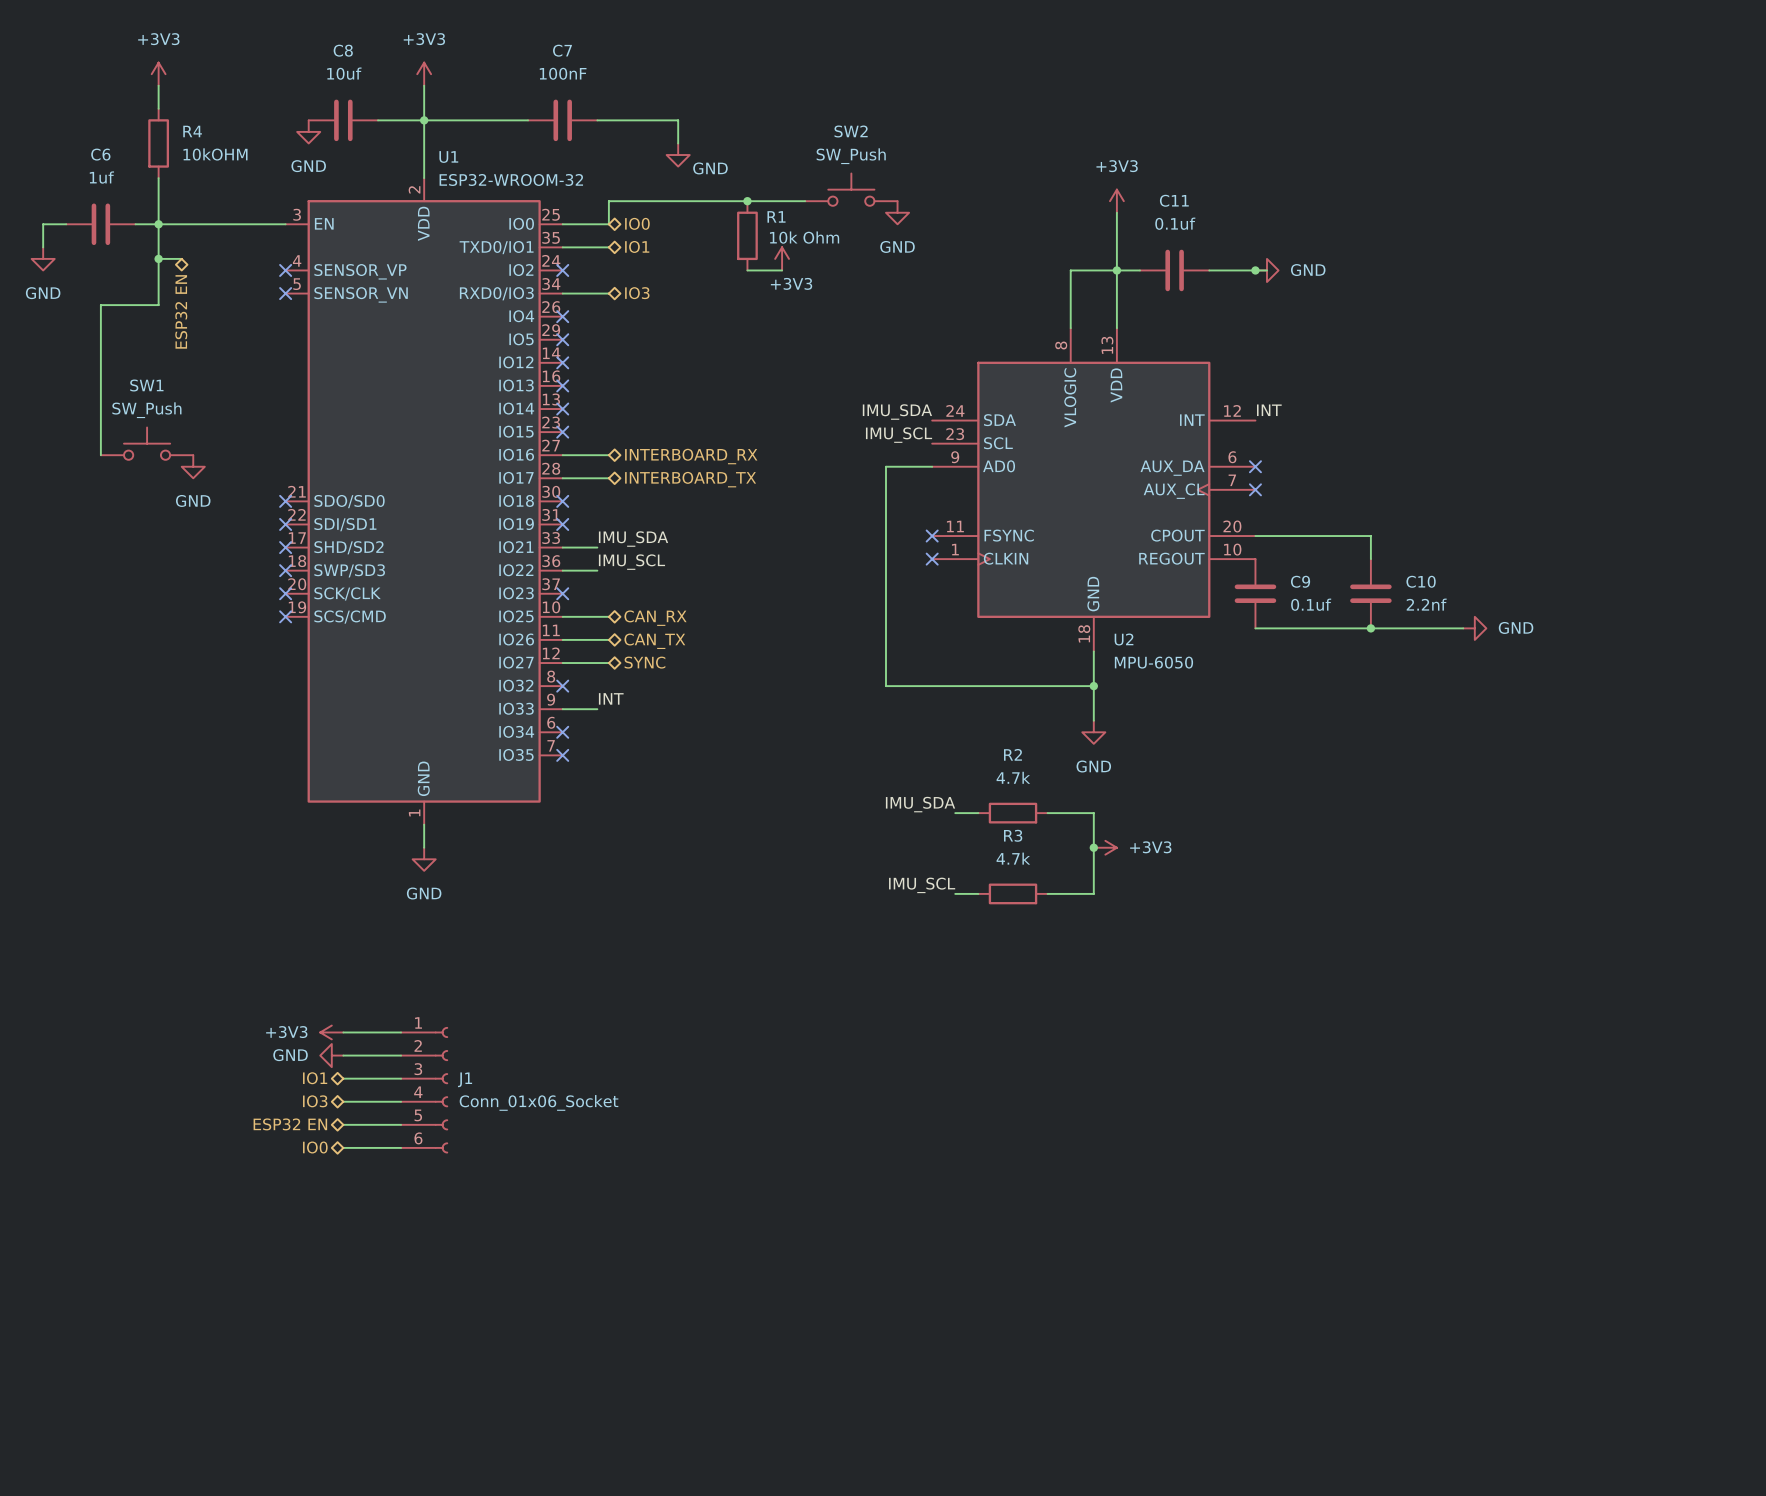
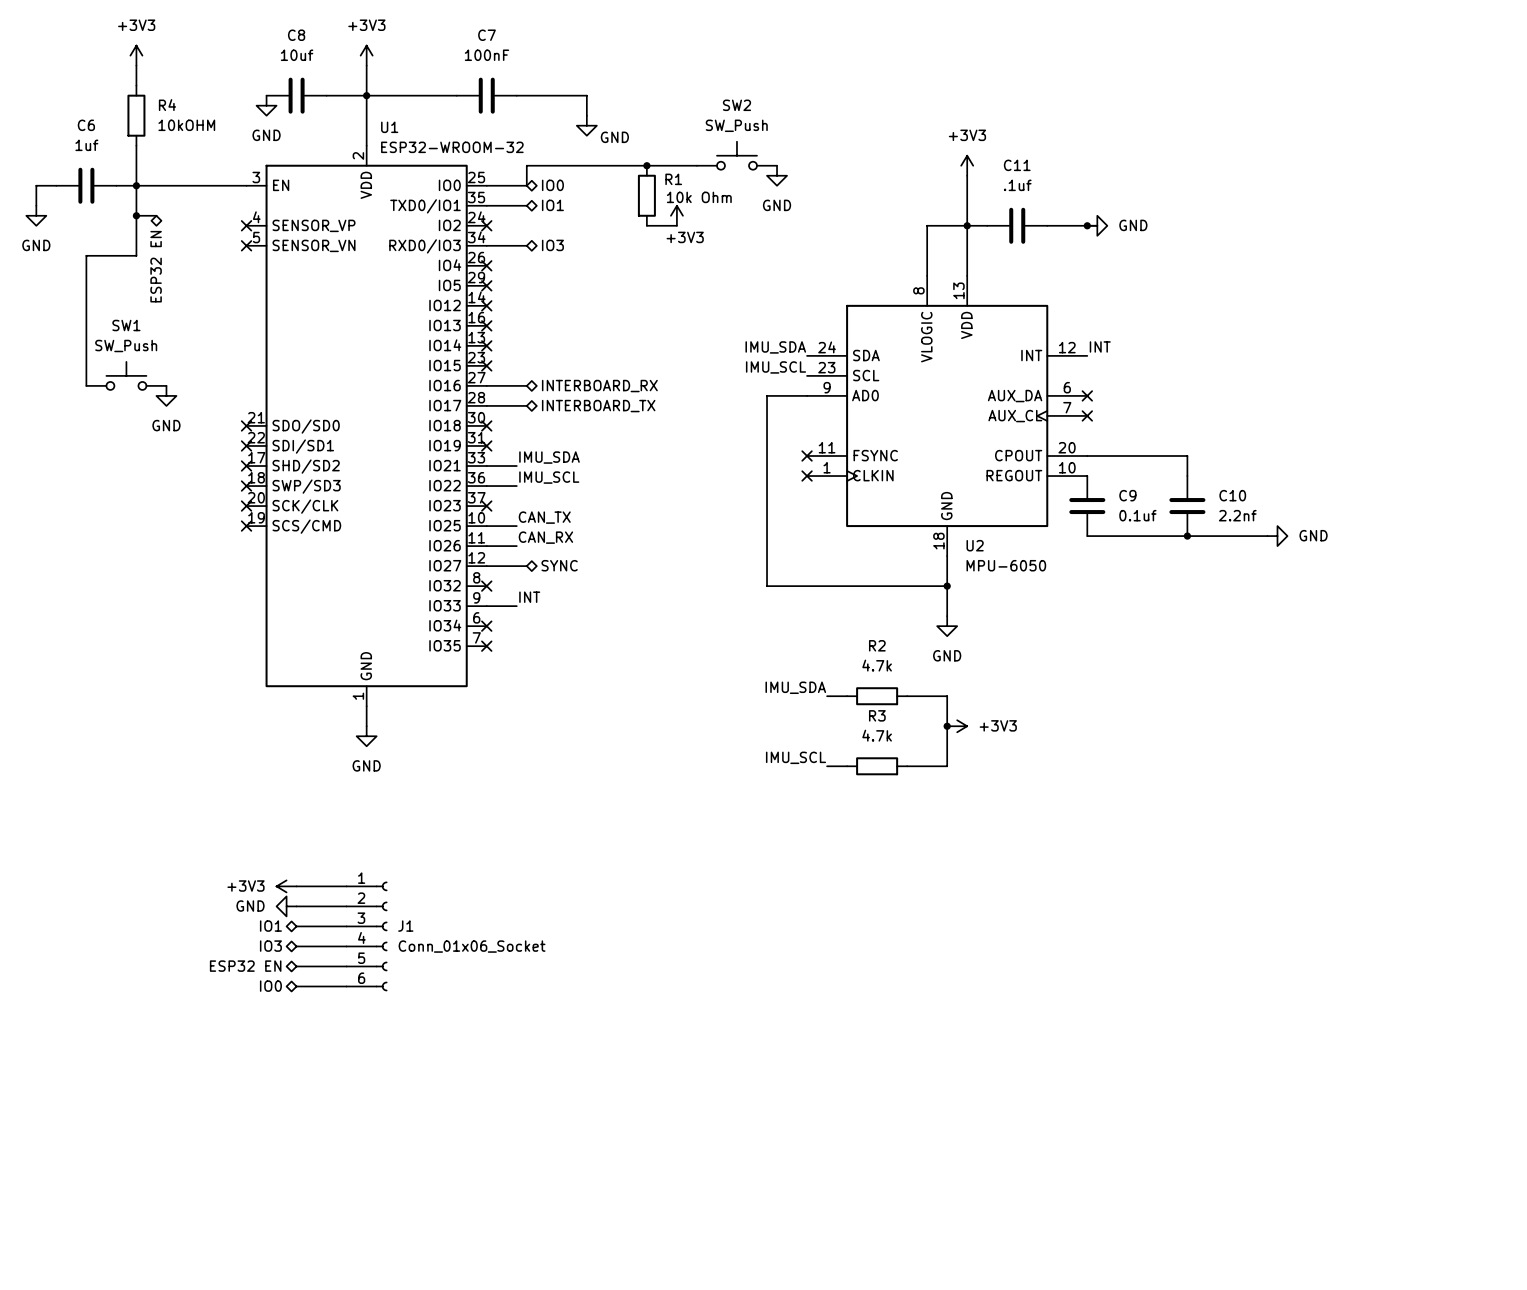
C11 value: 0.1uf (1175, 223) -> .1uf (1017, 185)
label: none -> CAN_TX (544, 517)
wire: (597, 616) (608, 616) -> none
hierarchical label: CAN_RX (655, 618) -> none
label: none -> CAN_RX (545, 537)
wire: (597, 639) (608, 639) -> none
hierarchical label: CAN_TX (654, 641) -> none

